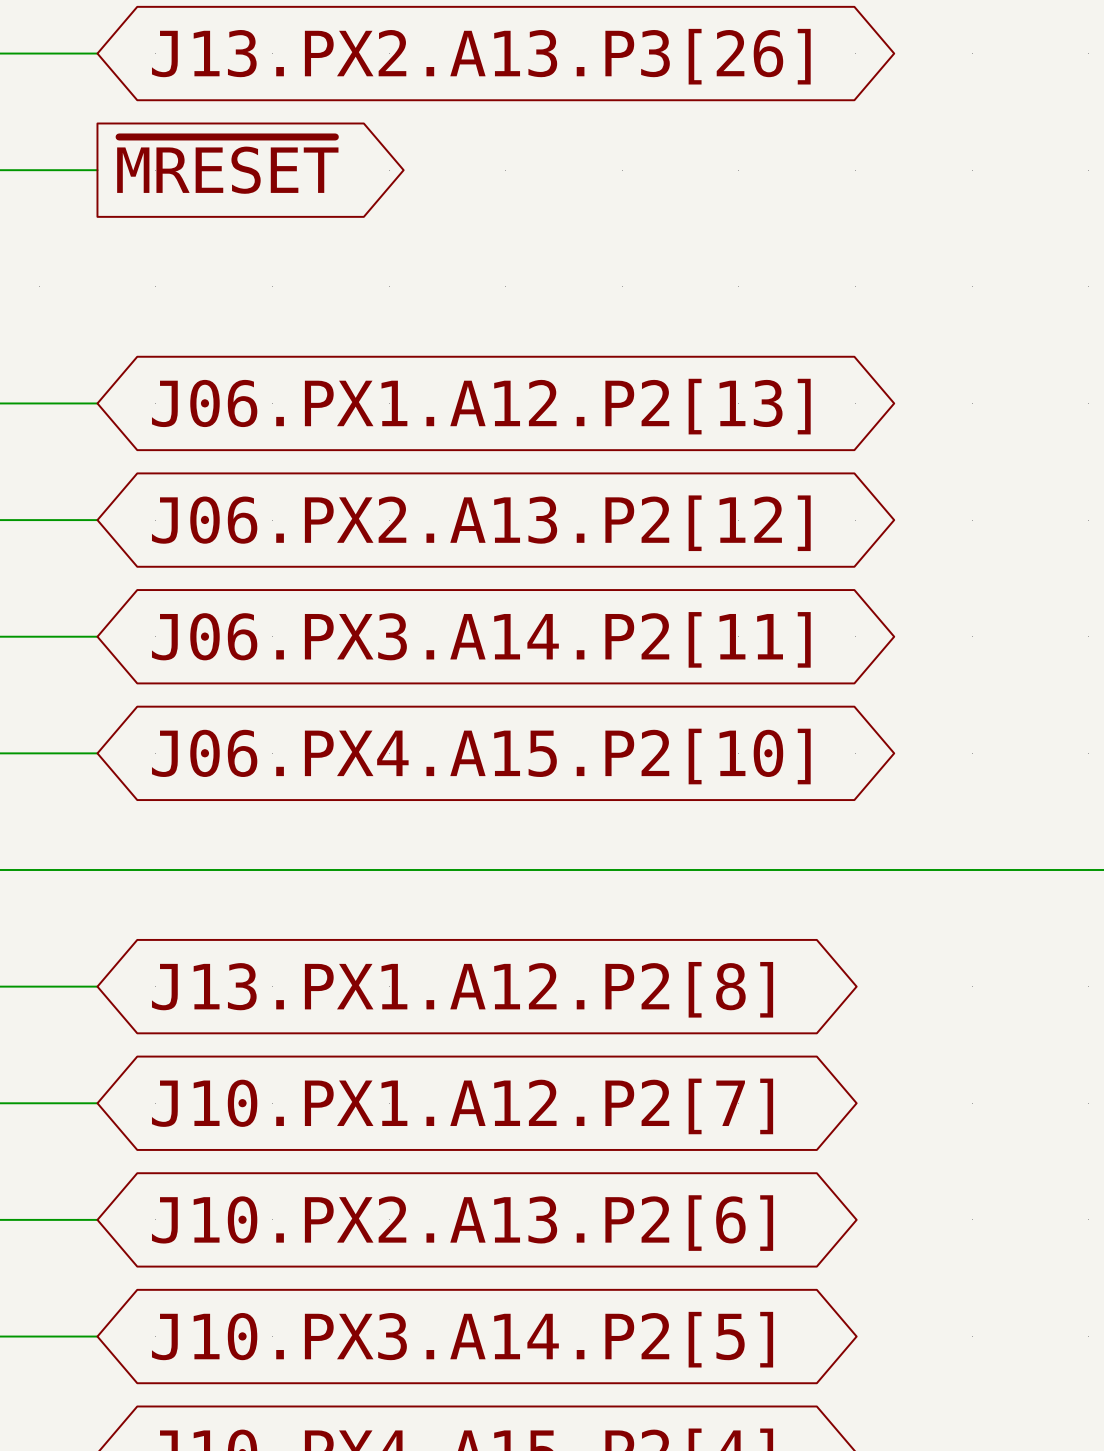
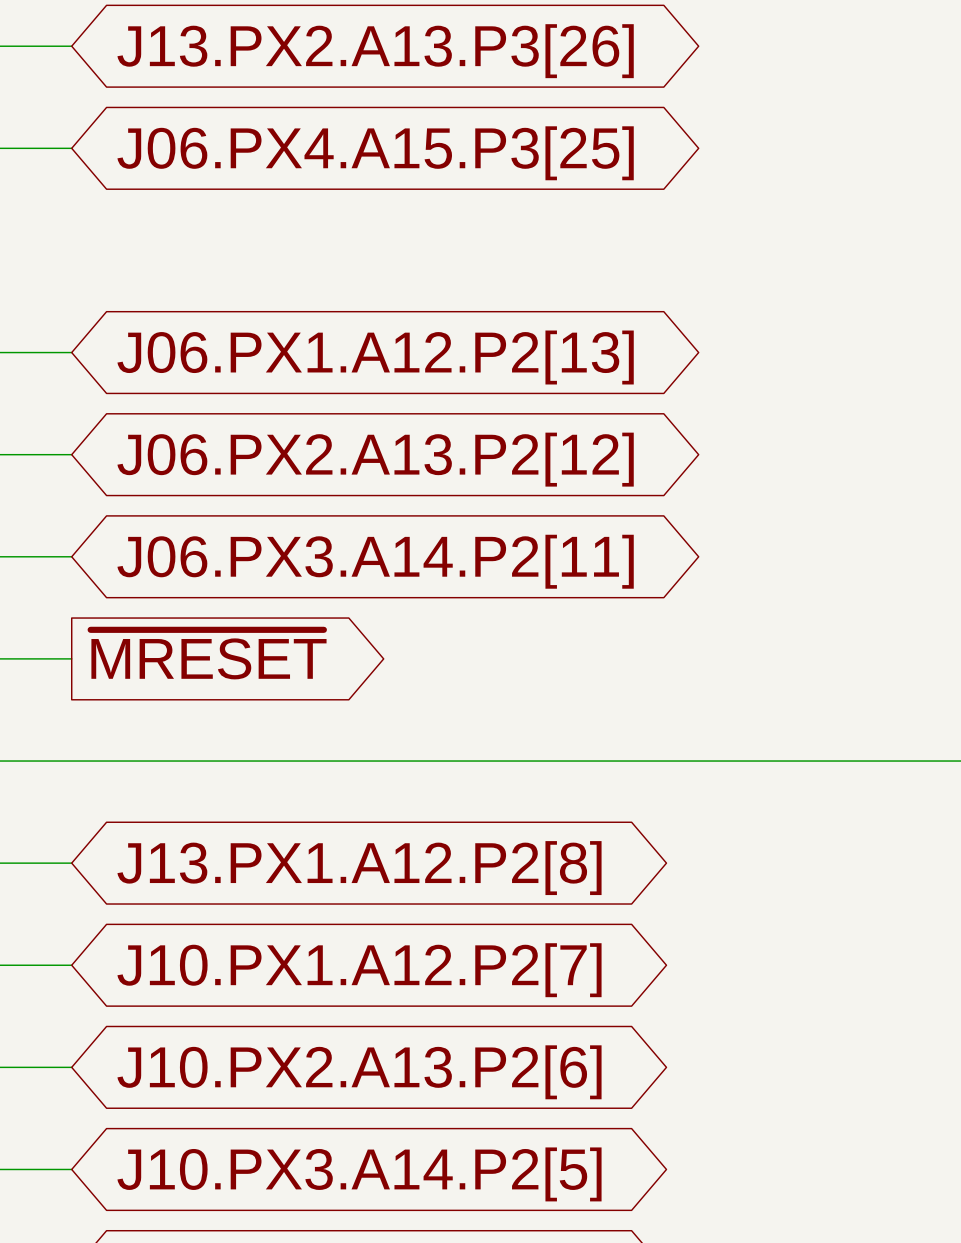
global label shape: output (227, 165) -> bidirectional (375, 153)
global label: ~{MRESET} (227, 165) -> J06.PX4.A15.P3[25] (375, 153)
global label shape: bidirectional (481, 756) -> output (208, 654)
global label: J06.PX4.A15.P2[10] (481, 756) -> ~{MRESET} (208, 654)

